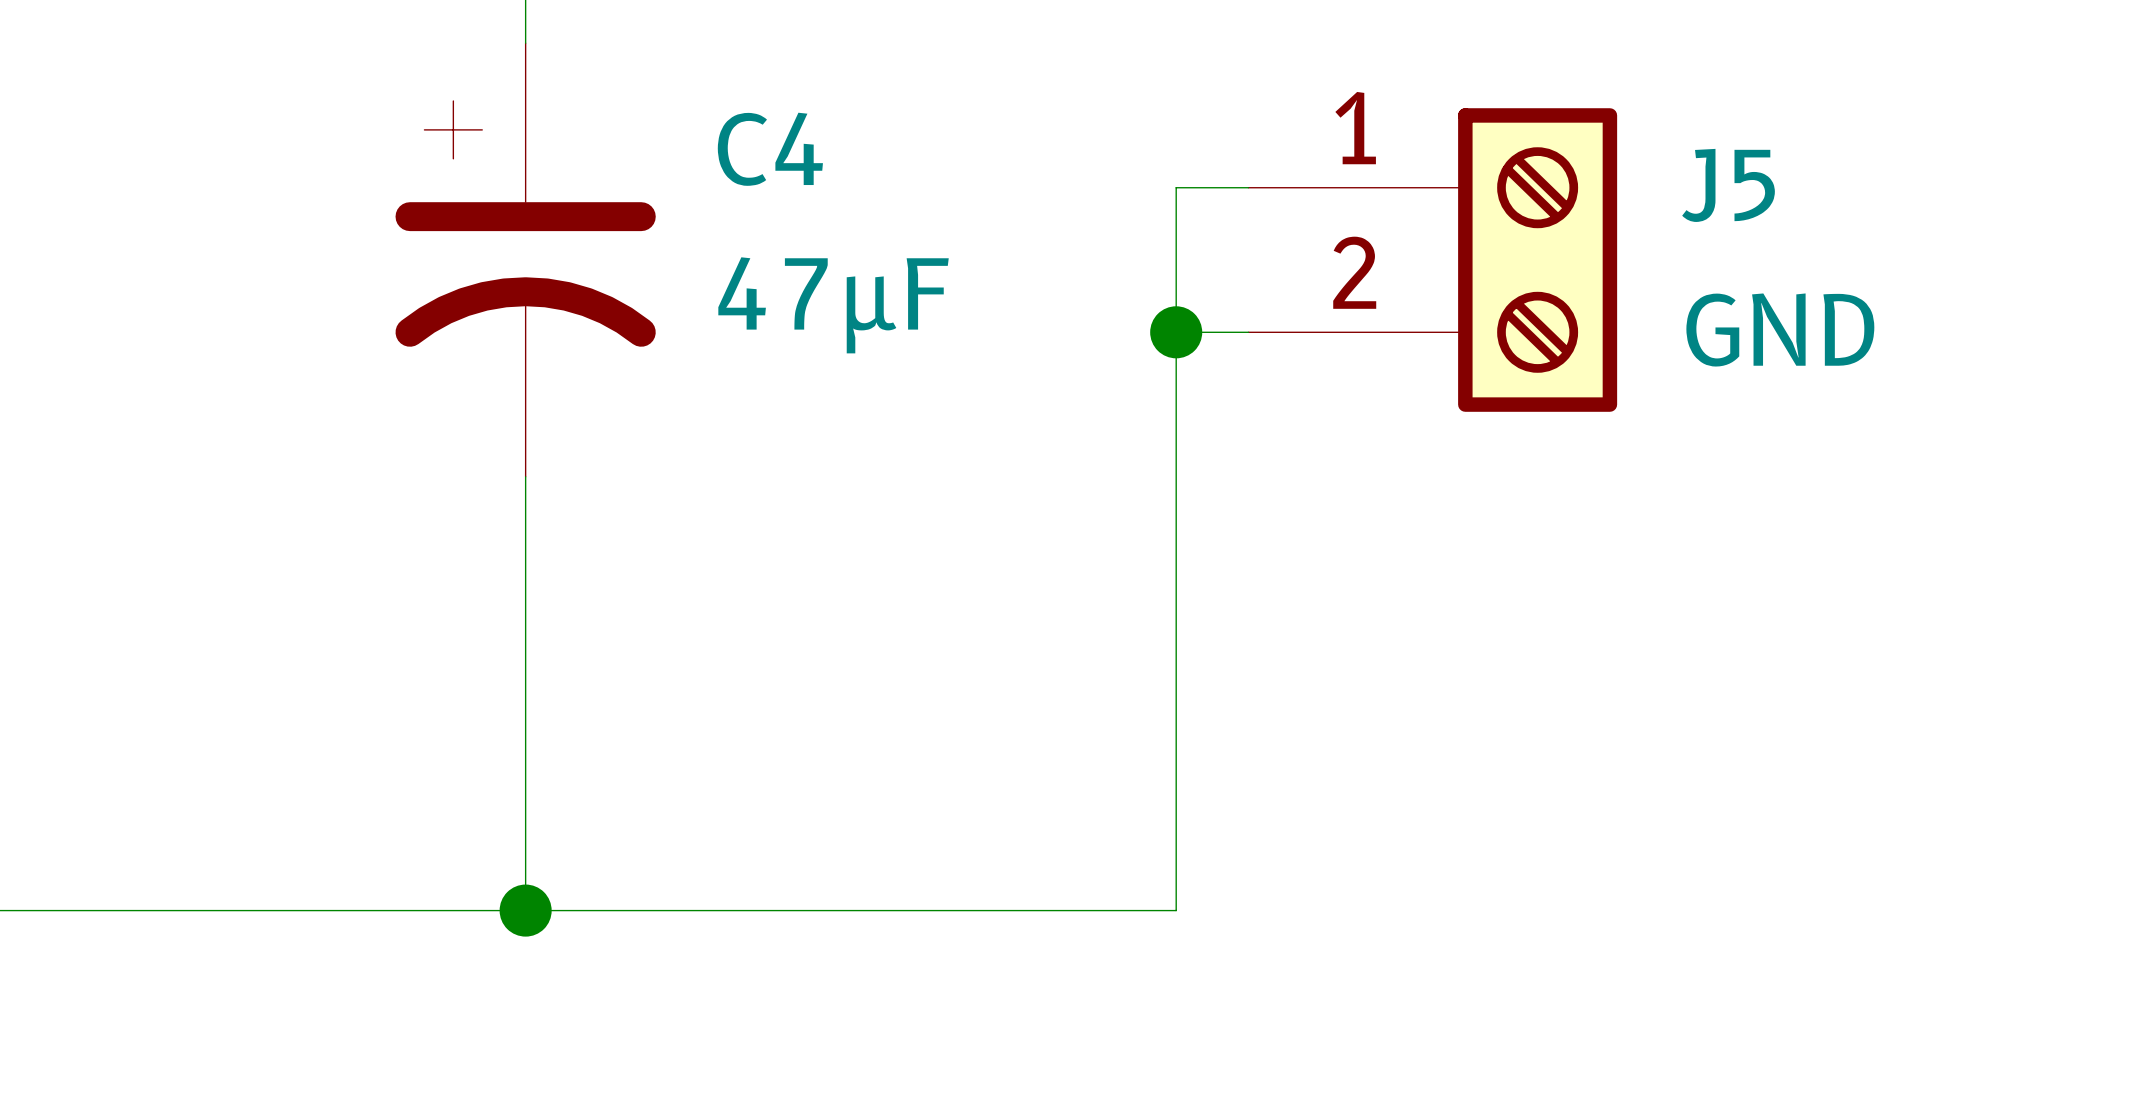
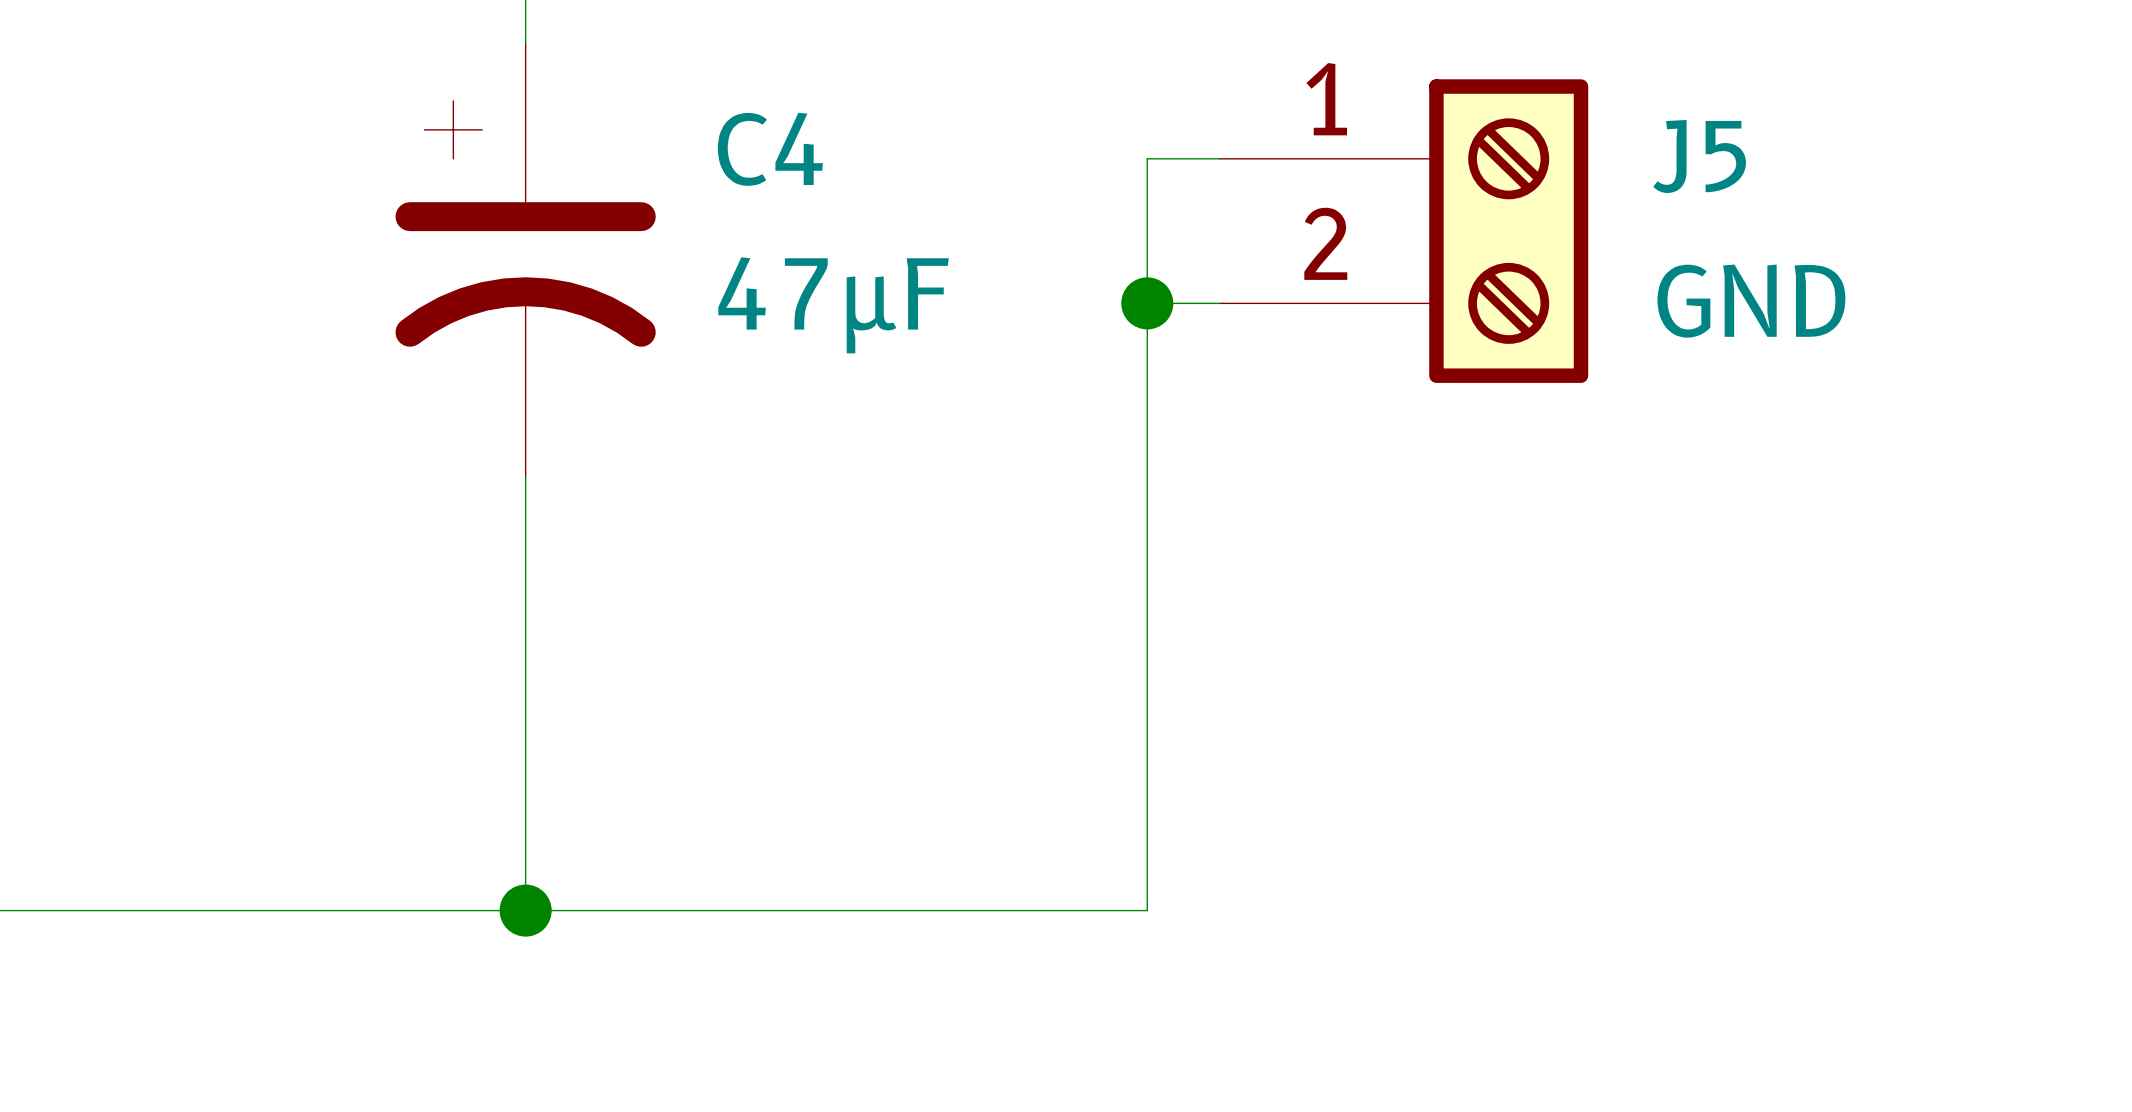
wire: (1248, 187) (1176, 187) (1176, 910) (1147, 910) -> (1219, 158) (1147, 158) (1147, 910)
J5 position: (1432, 260) -> (1403, 231)
wire: (1176, 332) (1248, 332) -> (1147, 303) (1219, 303)
junction position: (1176, 332) -> (1147, 303)

